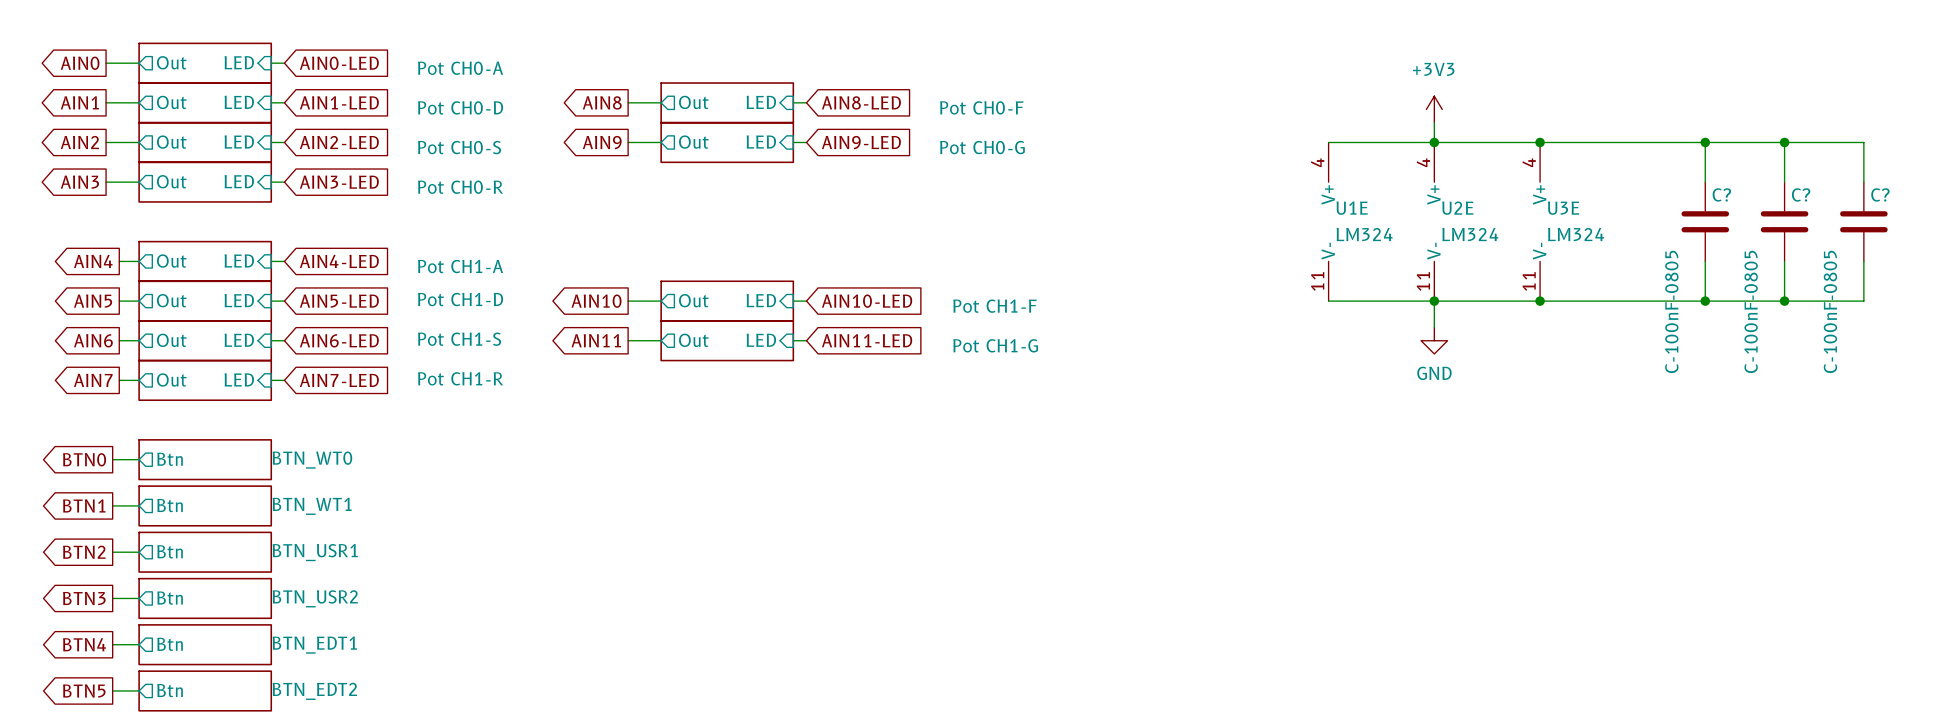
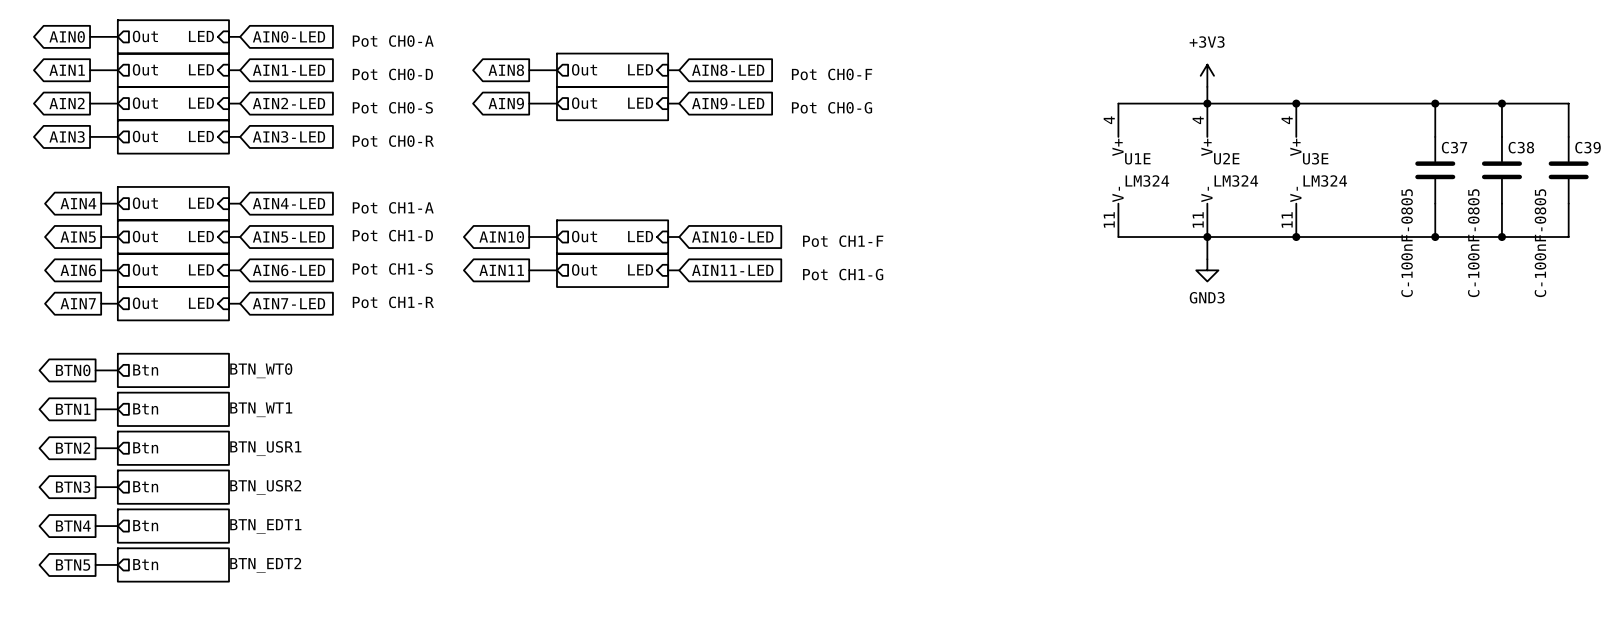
C? name: C? (1721, 194) -> C37 (1454, 147)
C? name: C? (1801, 194) -> C38 (1521, 147)
C? name: C? (1880, 194) -> C39 (1588, 147)
power symbol: GND (1434, 340) -> GND3 (1207, 270)

